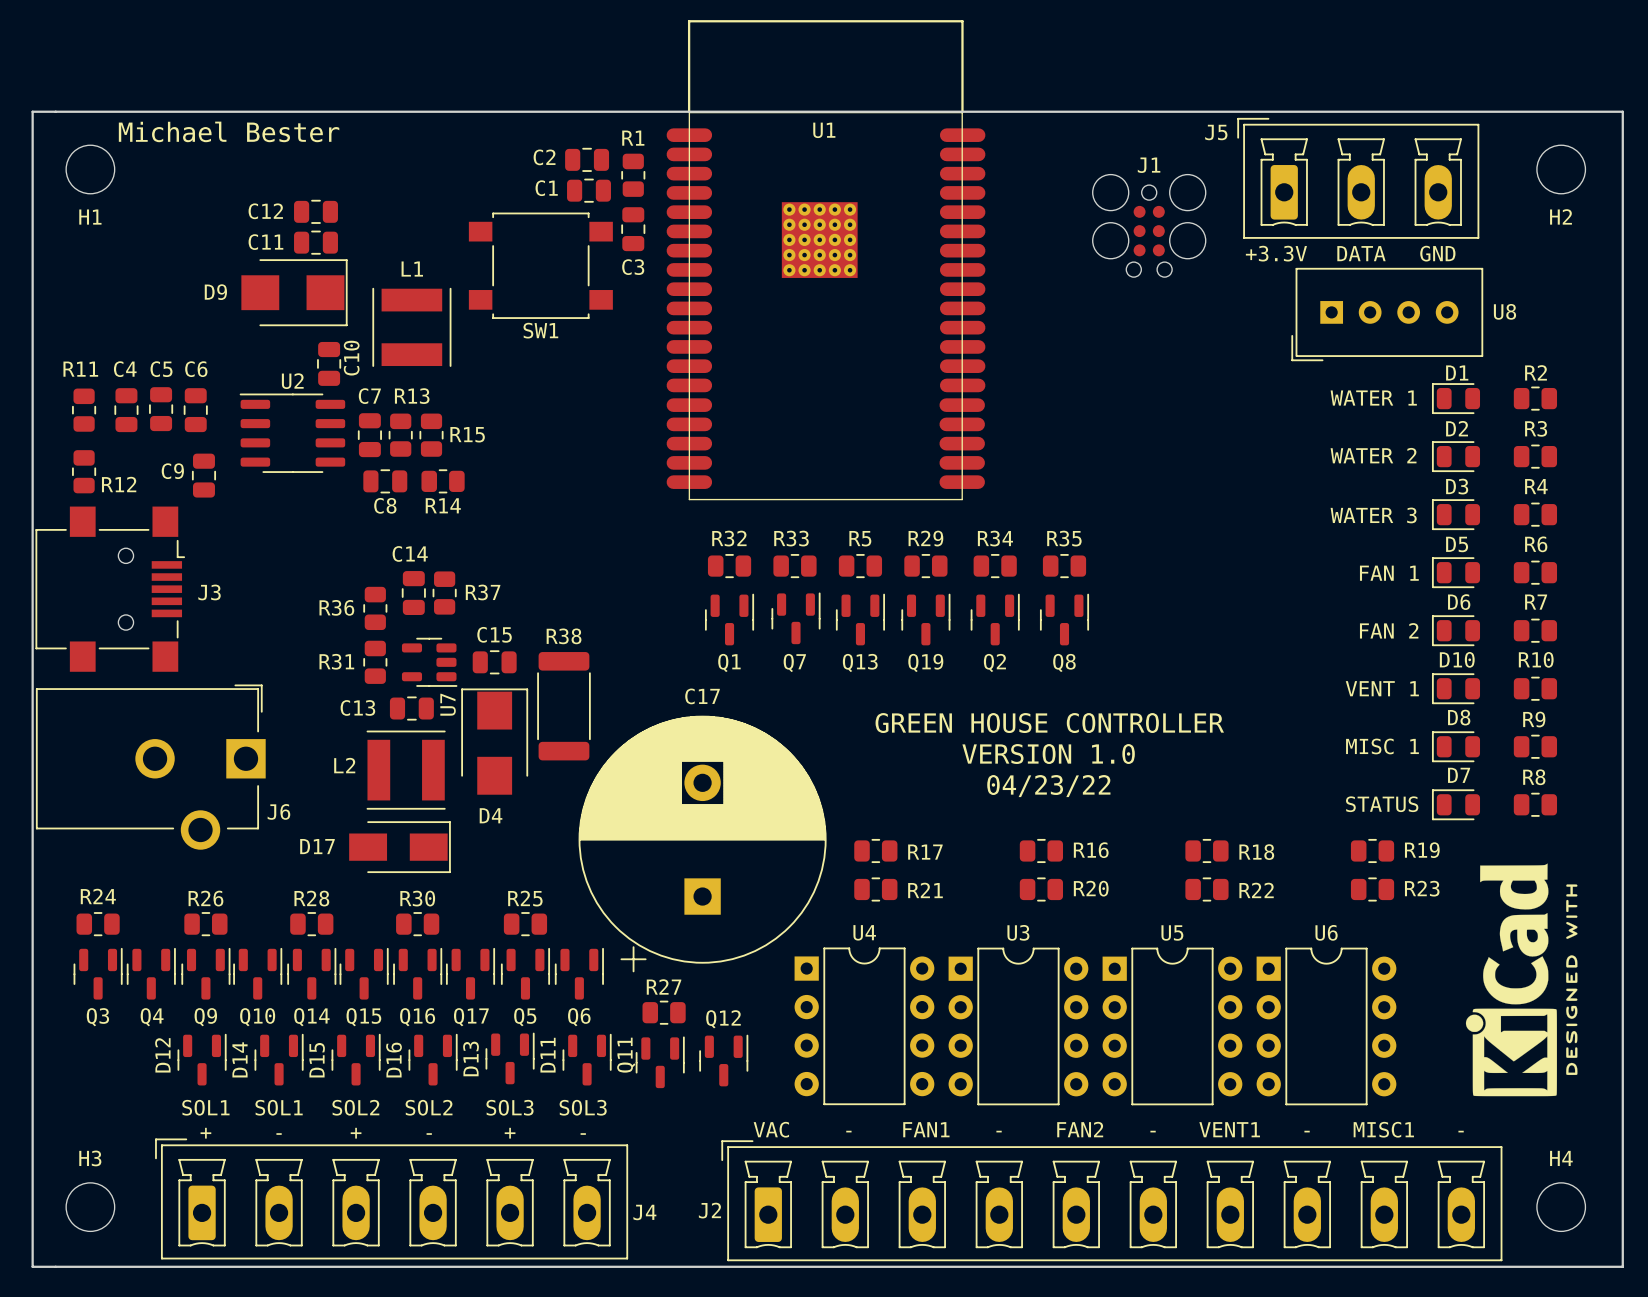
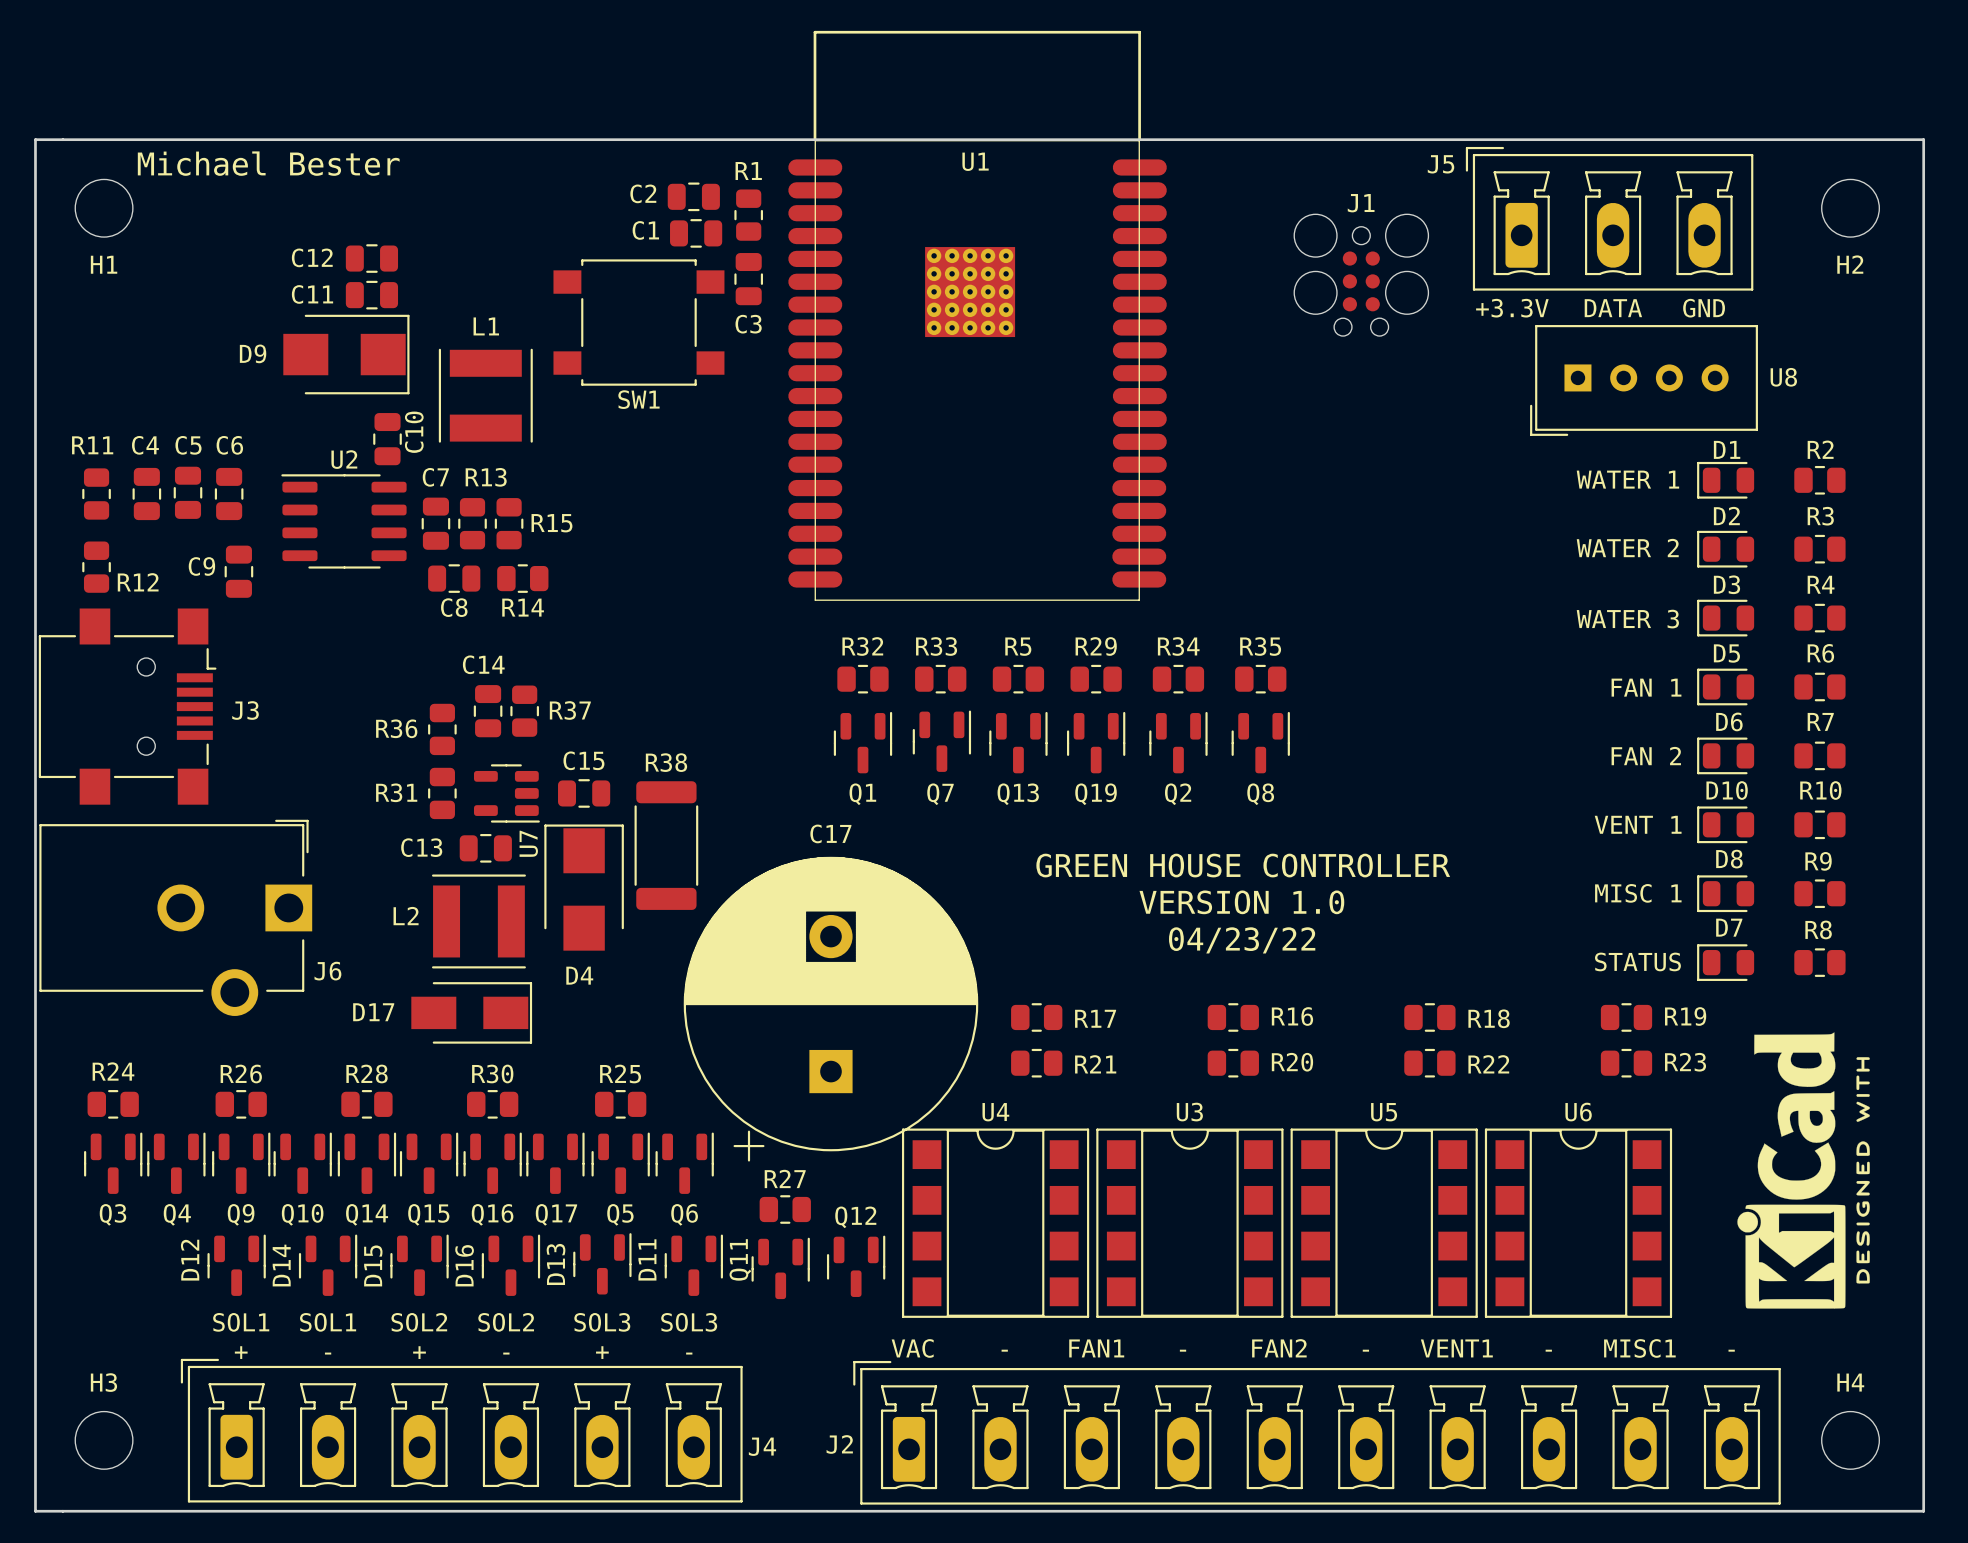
U4 footprint: [794, 947, 935, 1106] -> [901, 1128, 1090, 1318]
U3 footprint: [948, 947, 1089, 1106] -> [1096, 1128, 1284, 1318]
U5 footprint: [1102, 947, 1243, 1106] -> [1290, 1128, 1478, 1318]
U6 footprint: [1256, 947, 1397, 1106] -> [1484, 1128, 1673, 1318]

